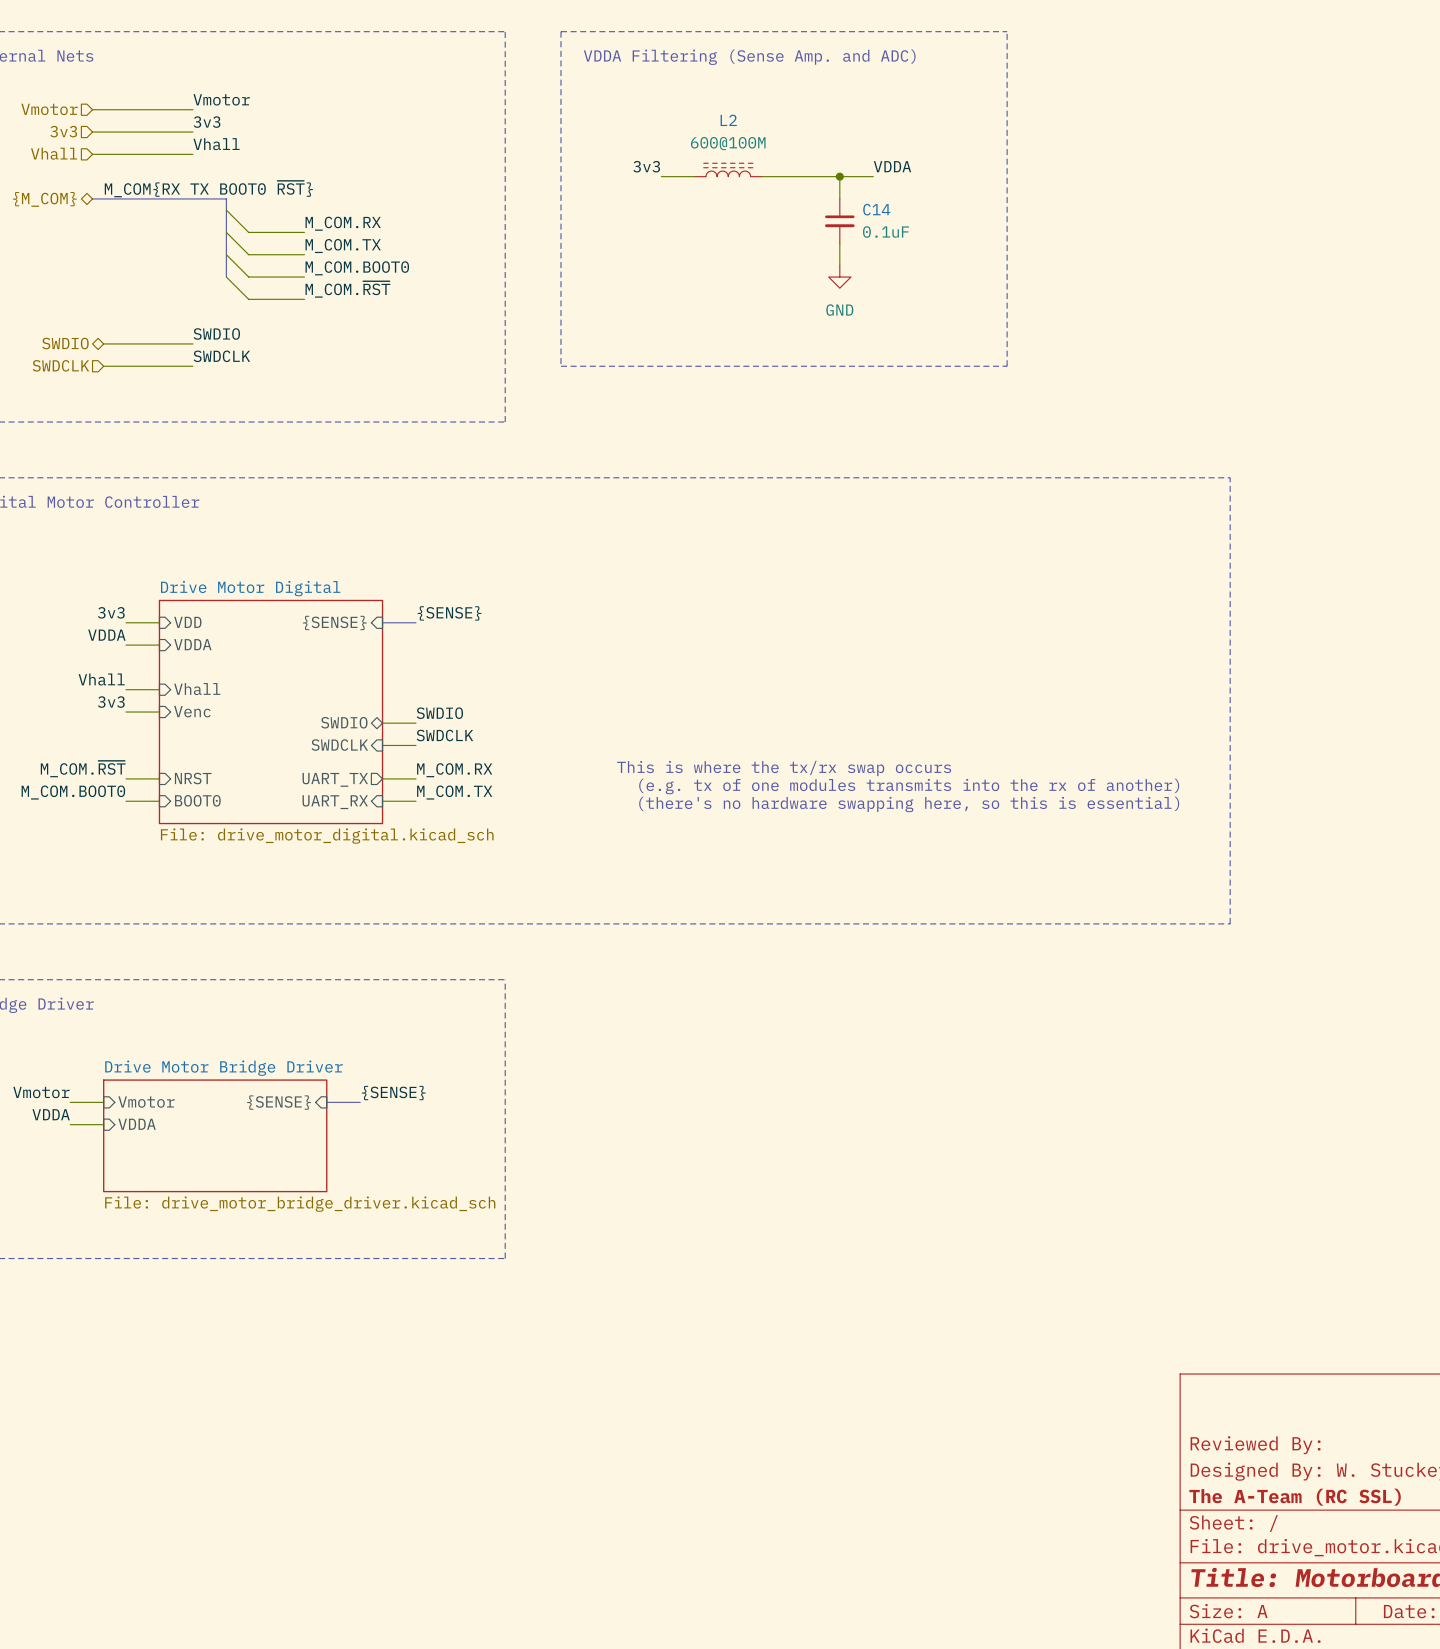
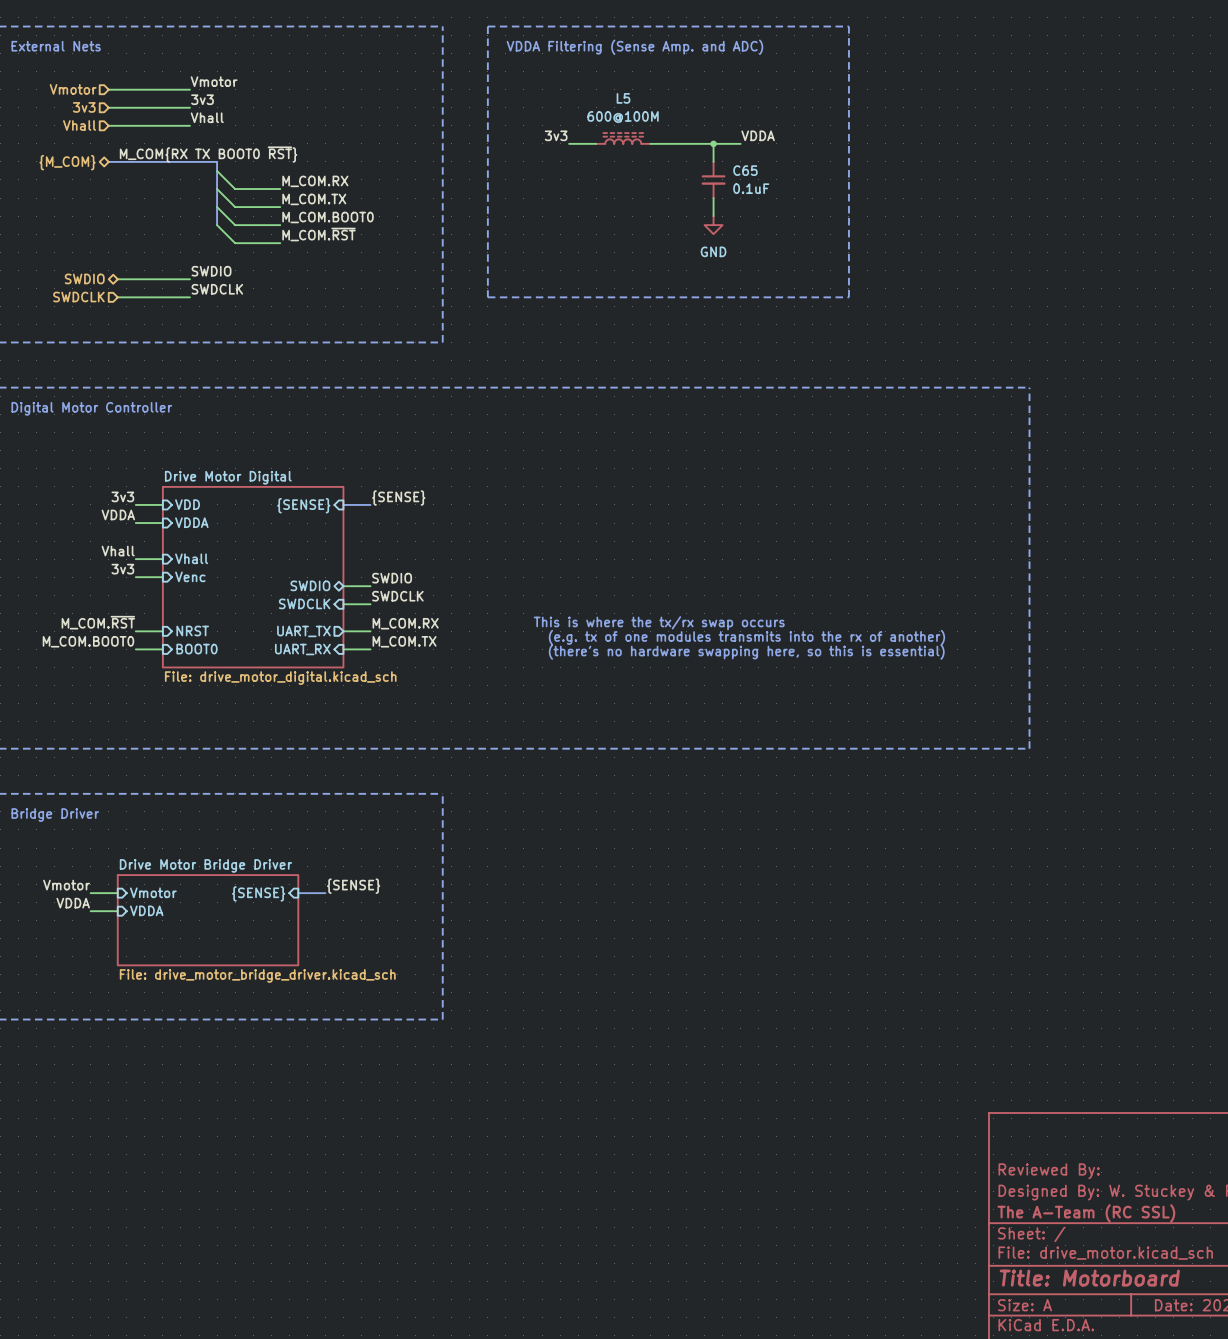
L2: 600@100M (728, 169) -> none
L5: none -> 600@100M (623, 138)
C14 name: C14 (876, 209) -> C65 (745, 170)

